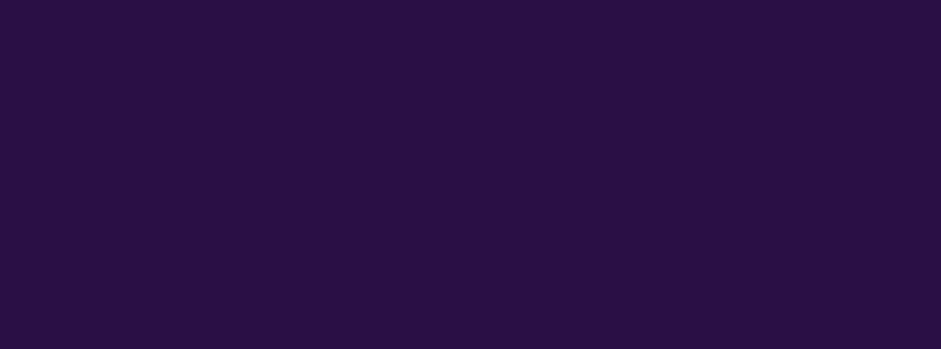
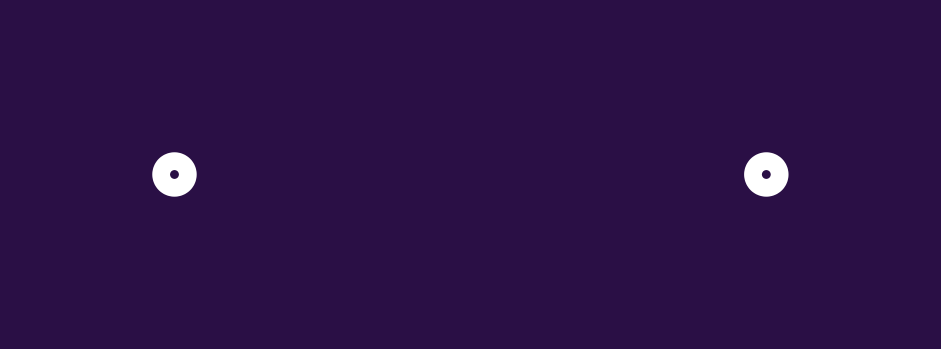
part: none -> (174, 174)
part: none -> (766, 174)

